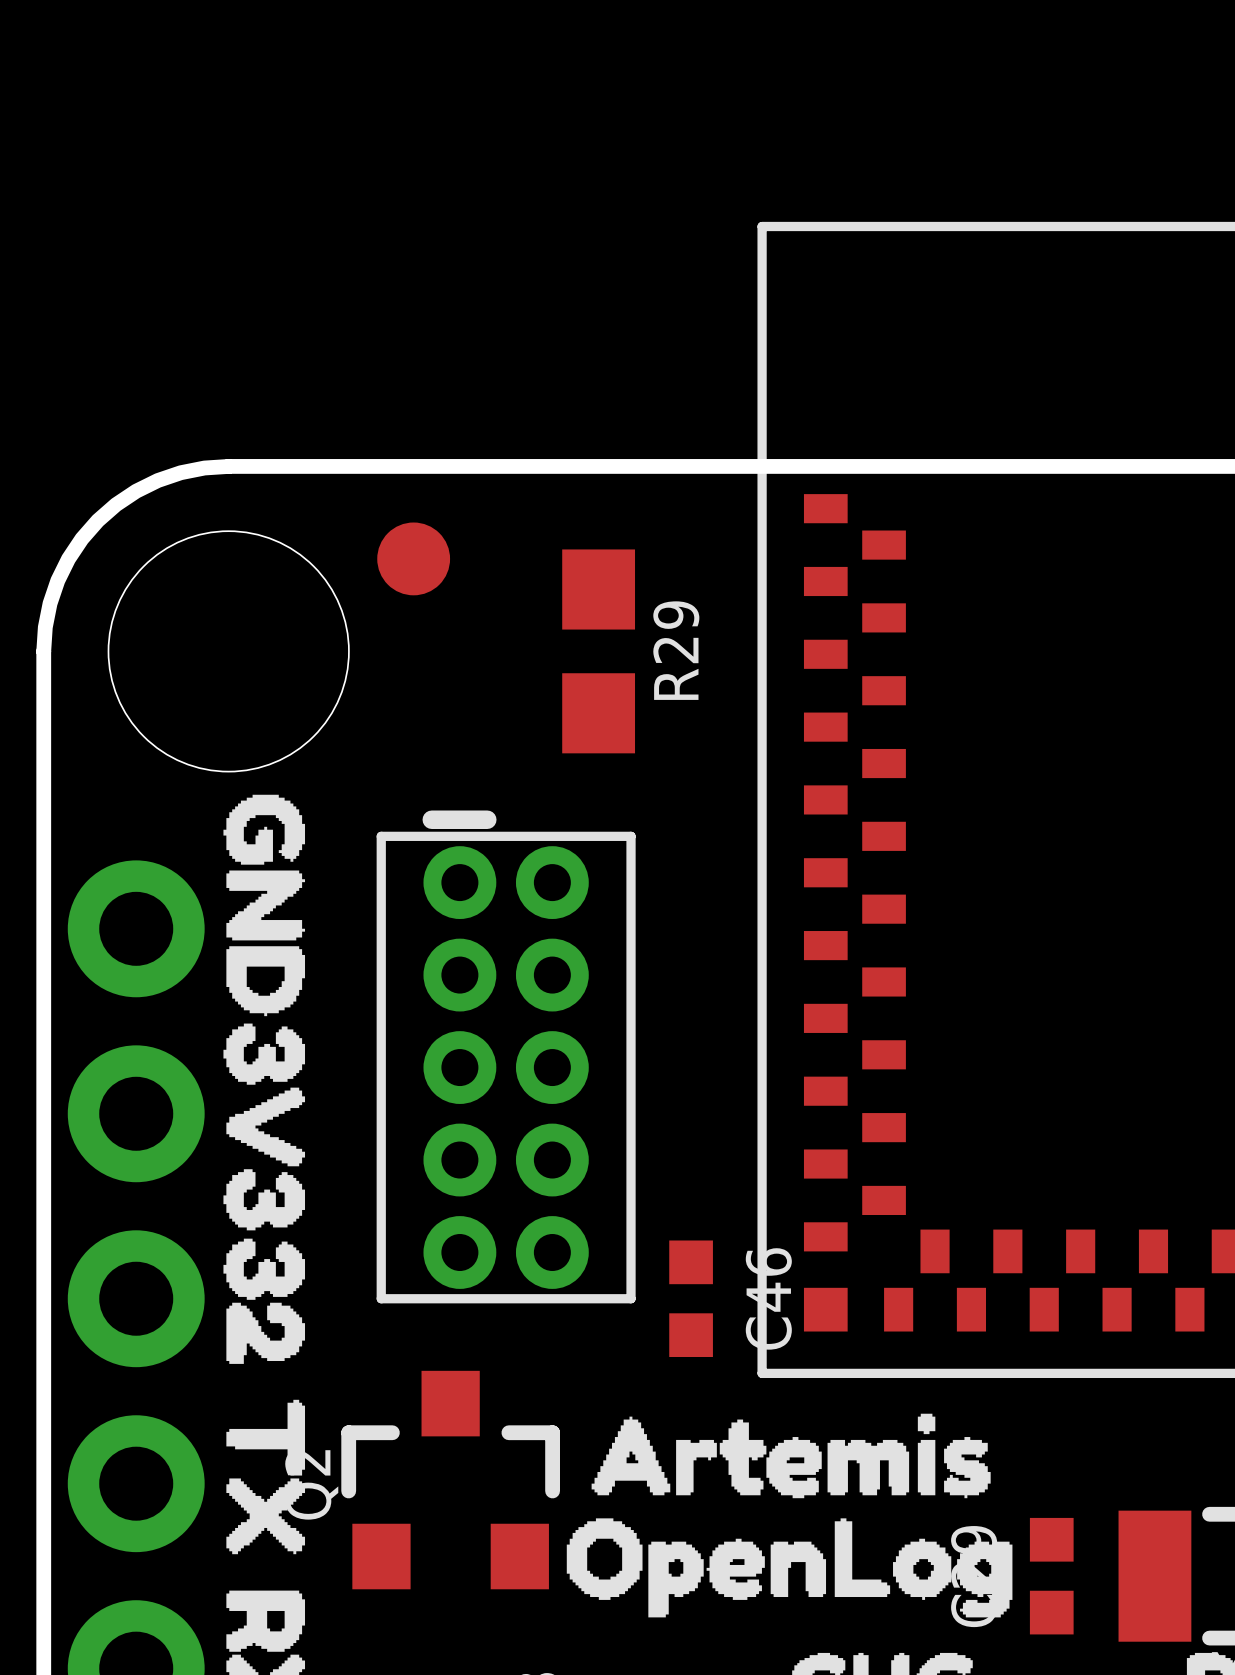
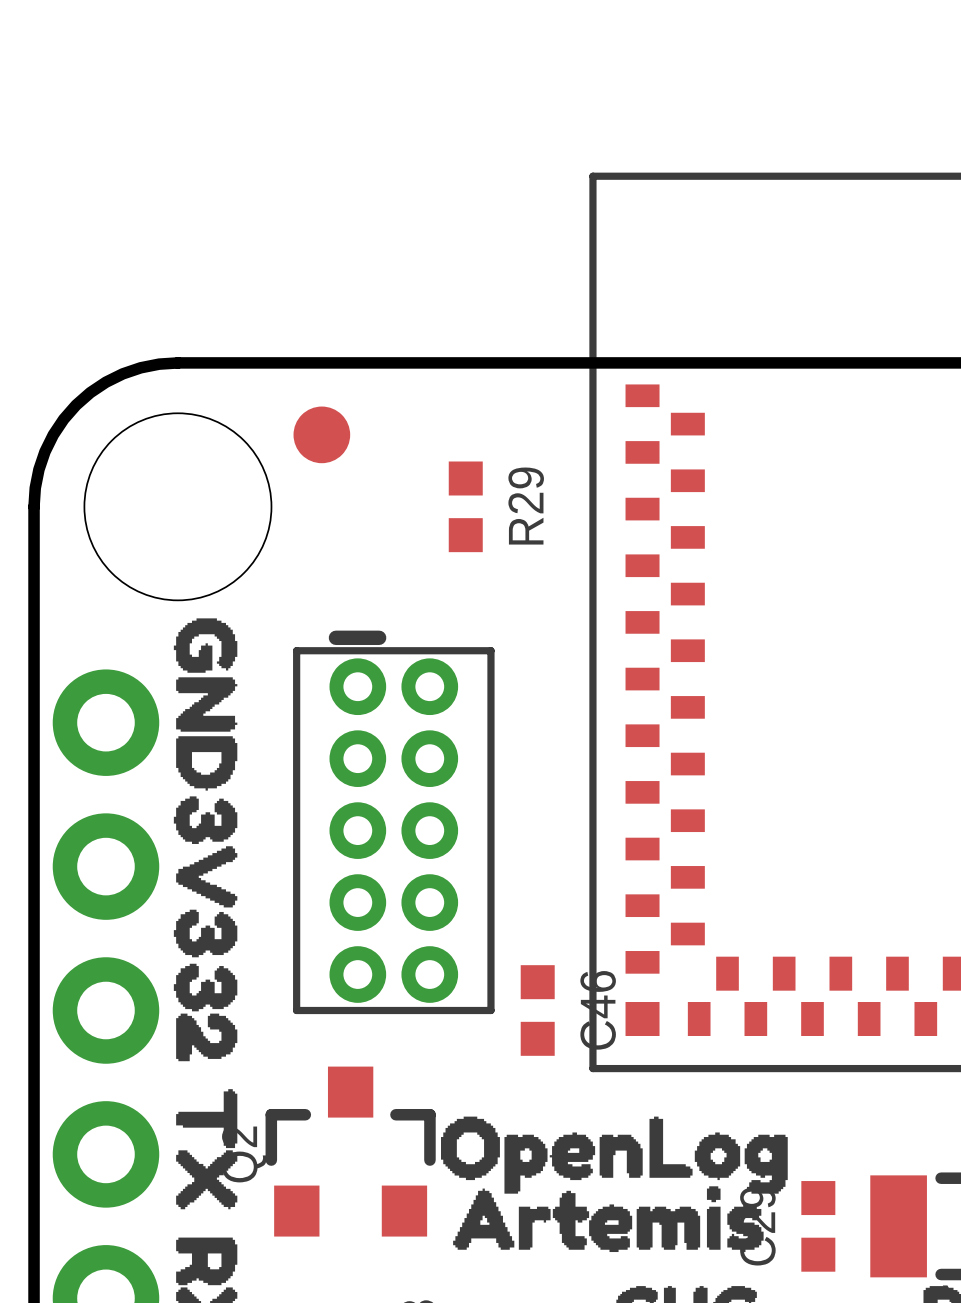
R29 footprint: [562, 549, 636, 754] -> [448, 461, 483, 553]
drawing position: (791, 1455) -> (608, 1219)
drawing position: (789, 1567) -> (614, 1155)

